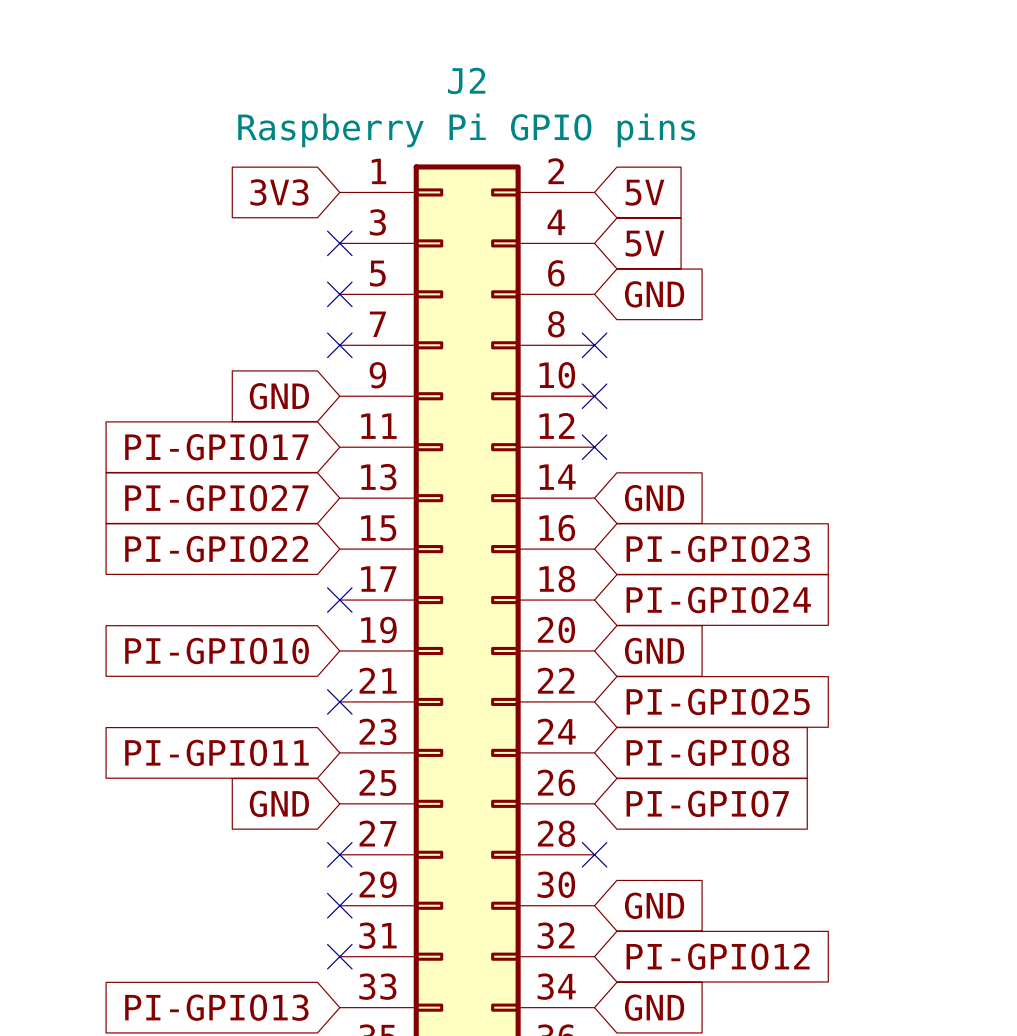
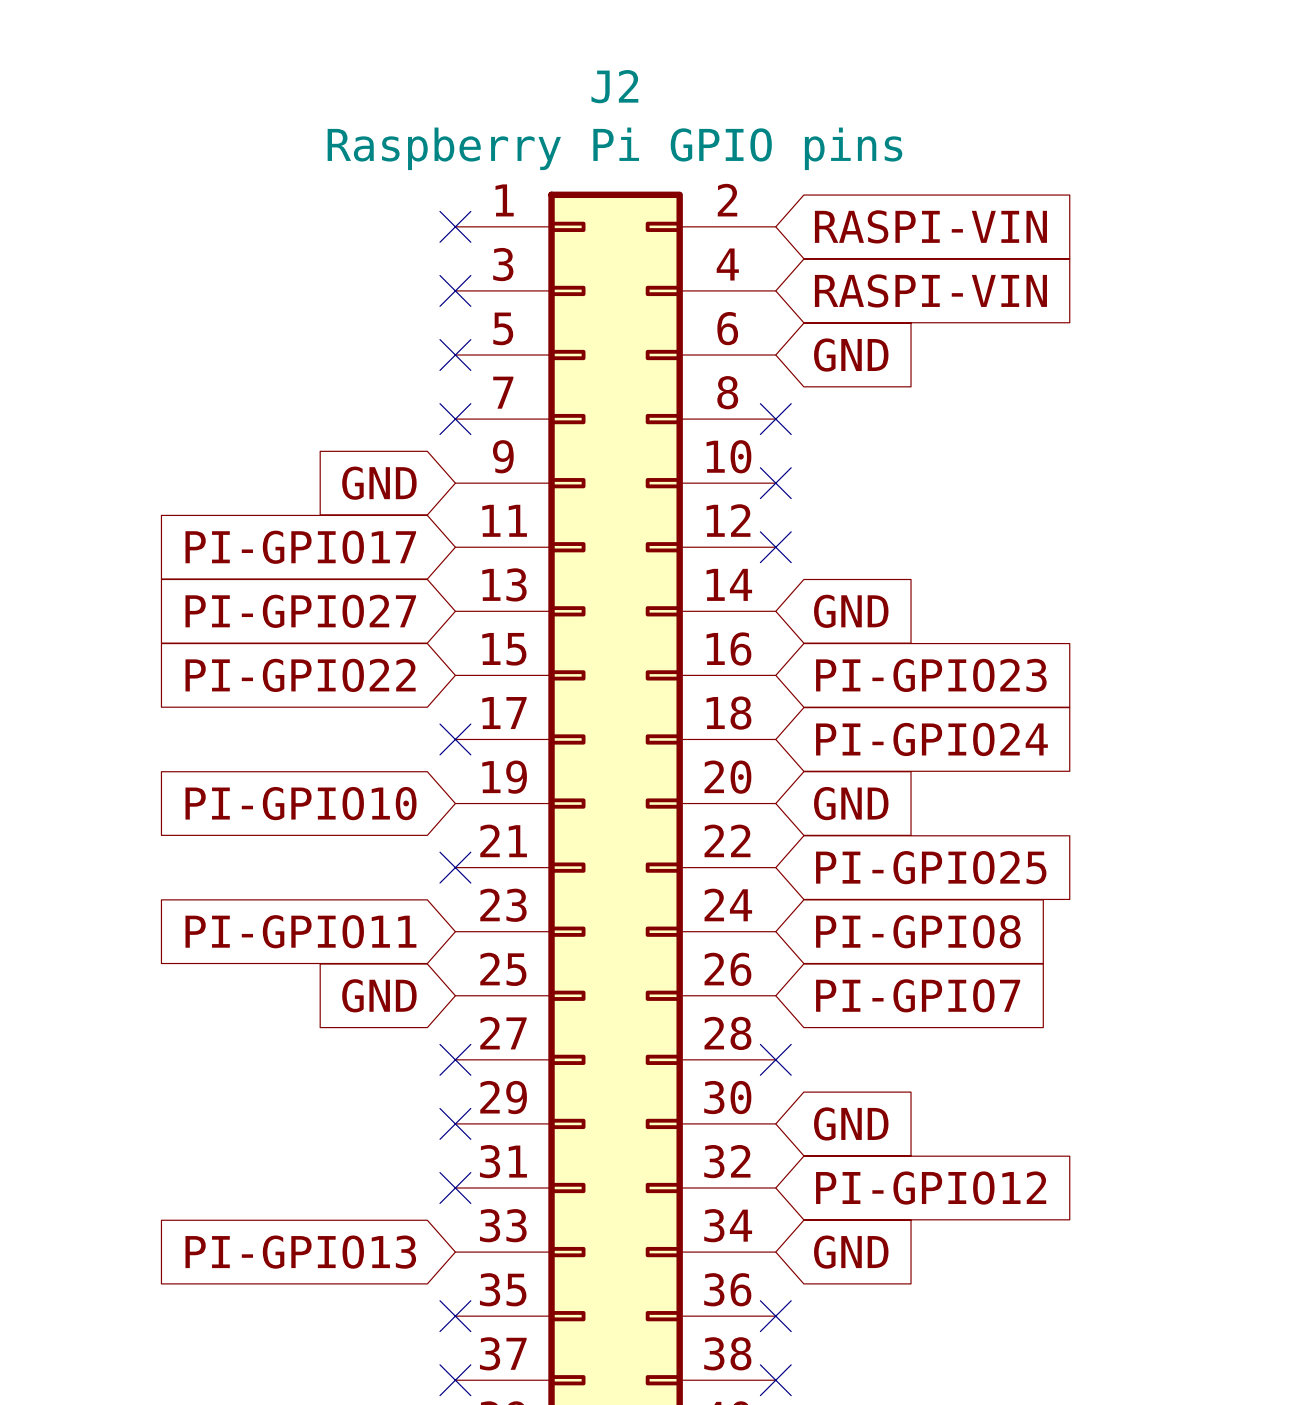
global label: 3V3 (279, 192) -> none
no-connect mark: none -> (455, 226)
global label: 5V (644, 192) -> RASPI-VIN (930, 226)
global label: 5V (644, 243) -> RASPI-VIN (930, 290)

